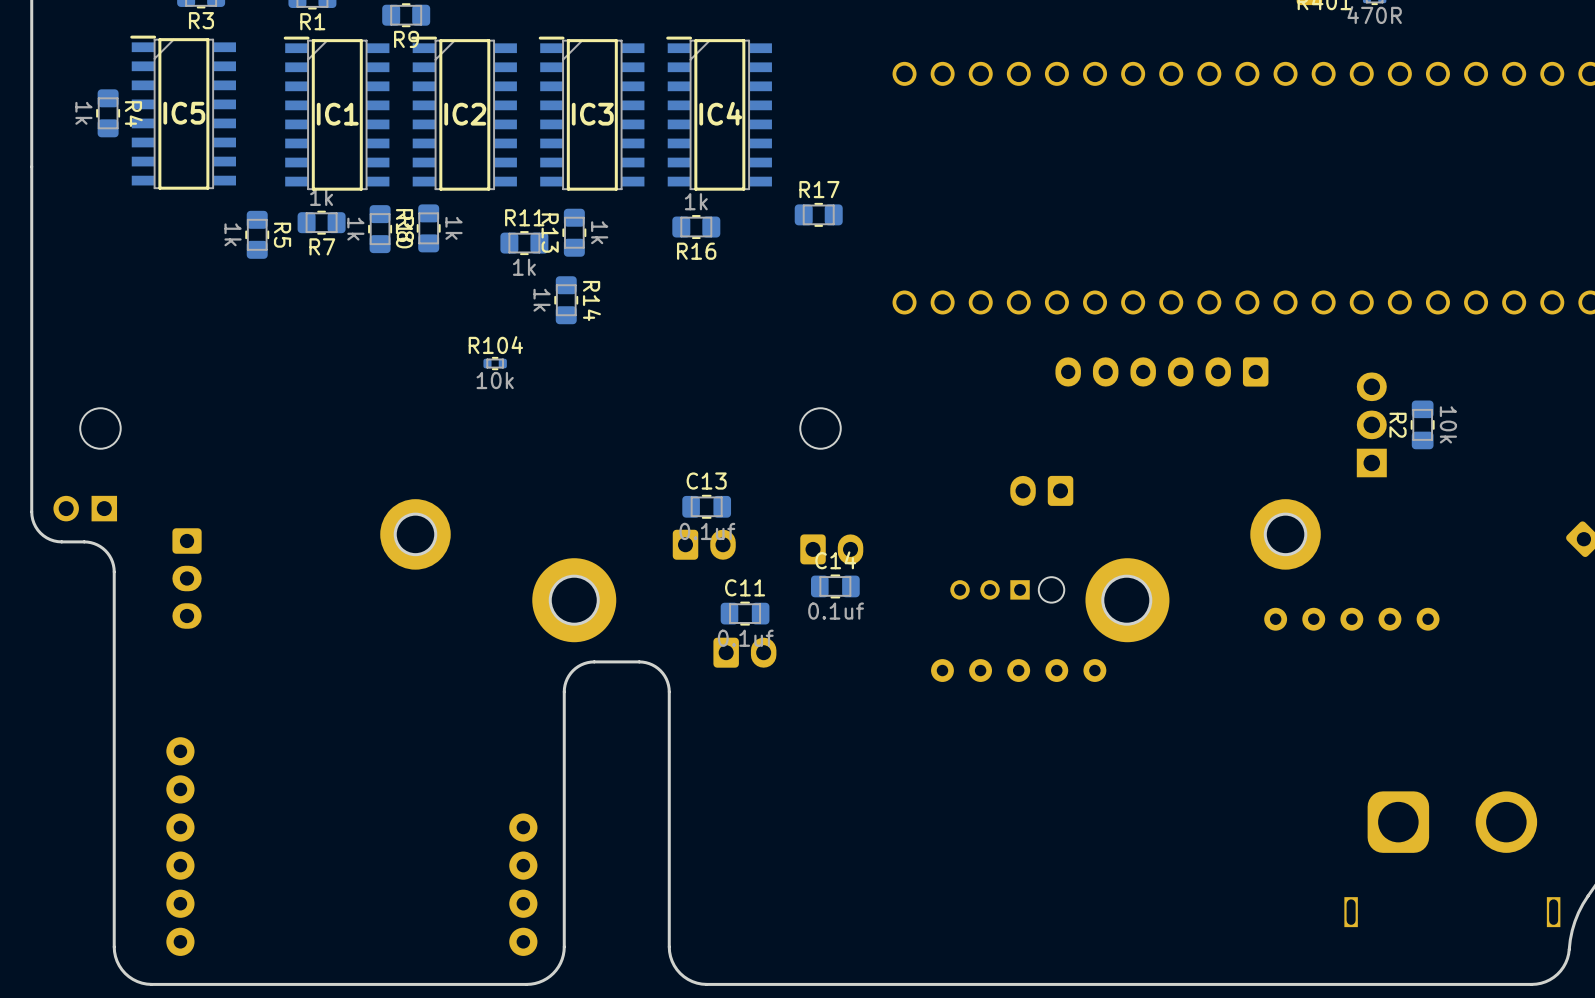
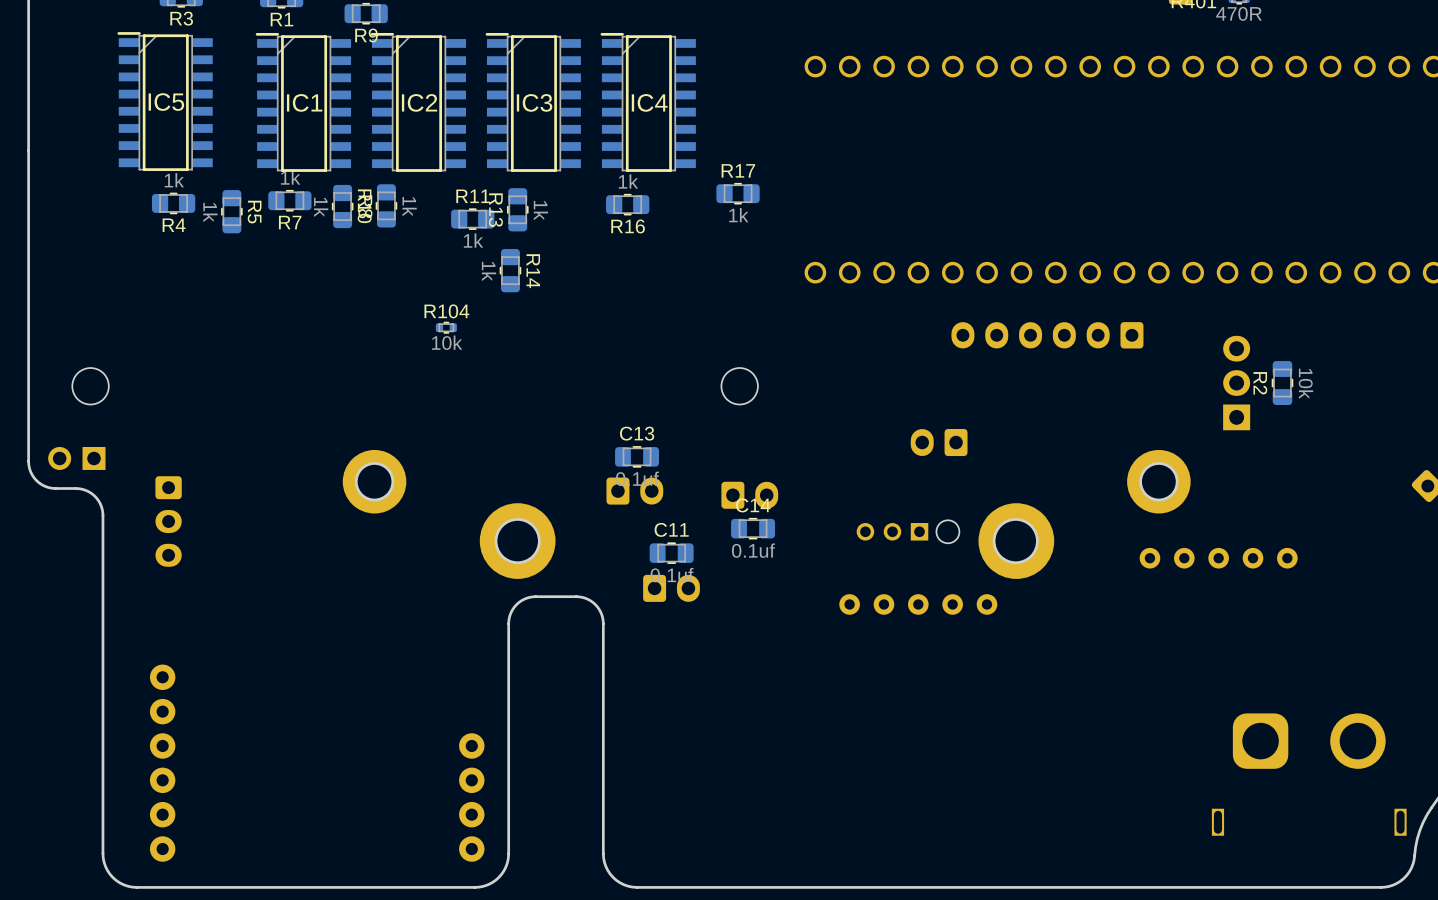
R4 rotation: 0° (108, 113) -> 90° clockwise (173, 203)
R4 position: (108, 113) -> (173, 203)
R17 value: none -> 1k (738, 215)

